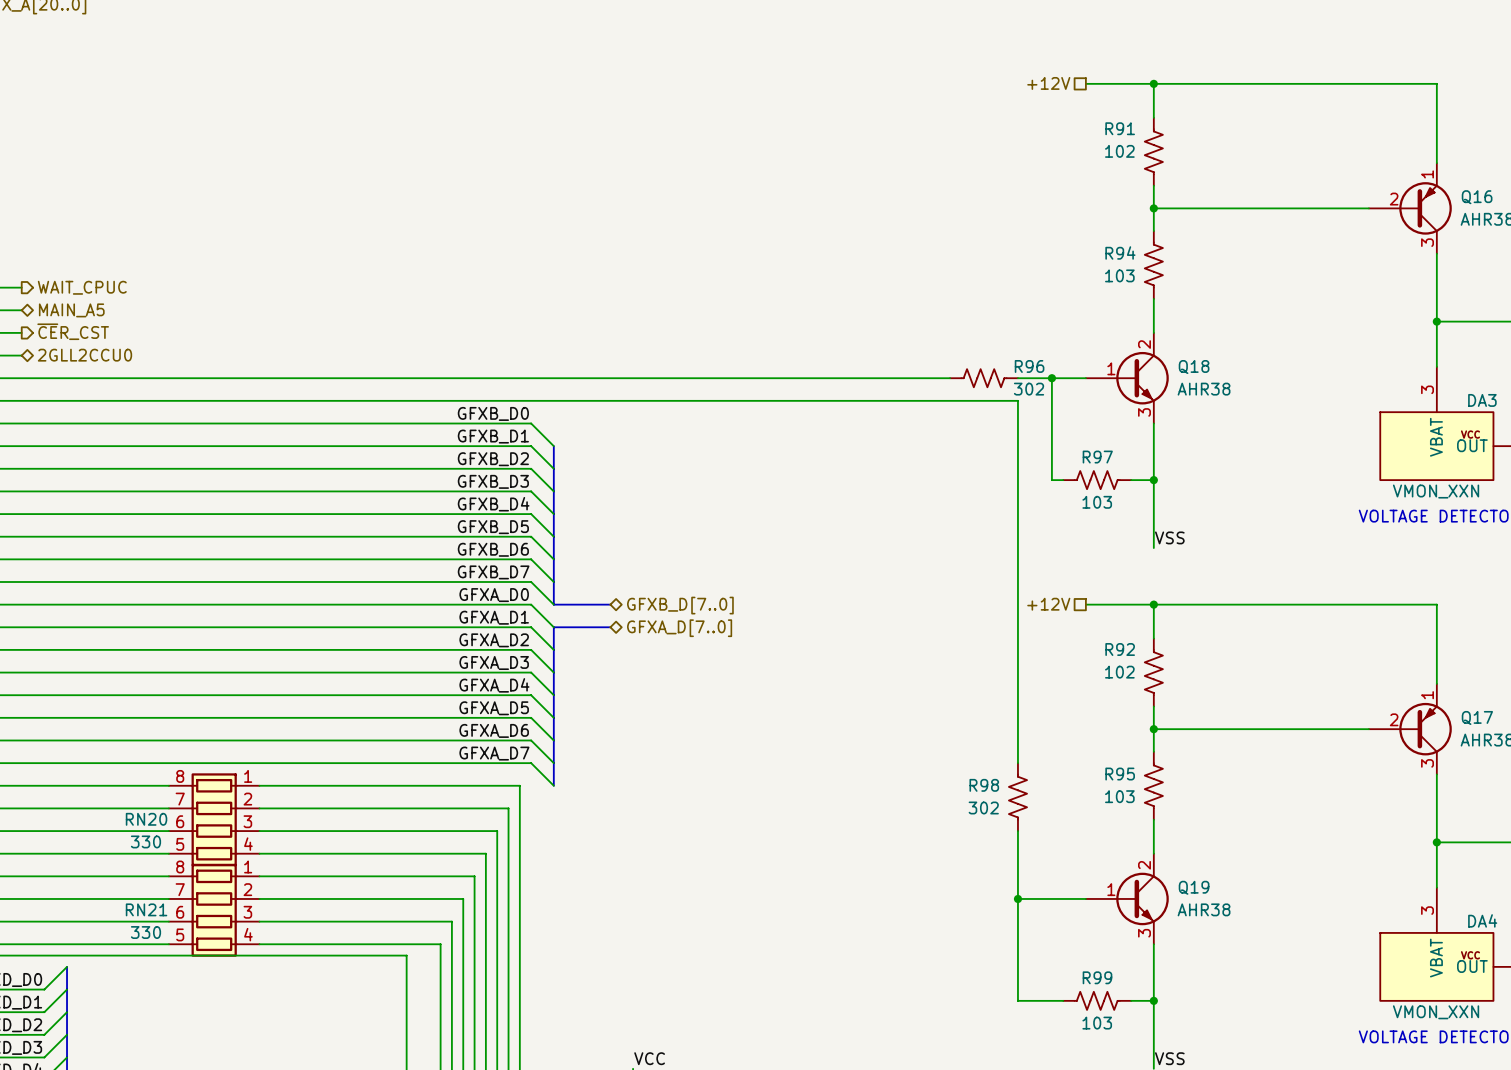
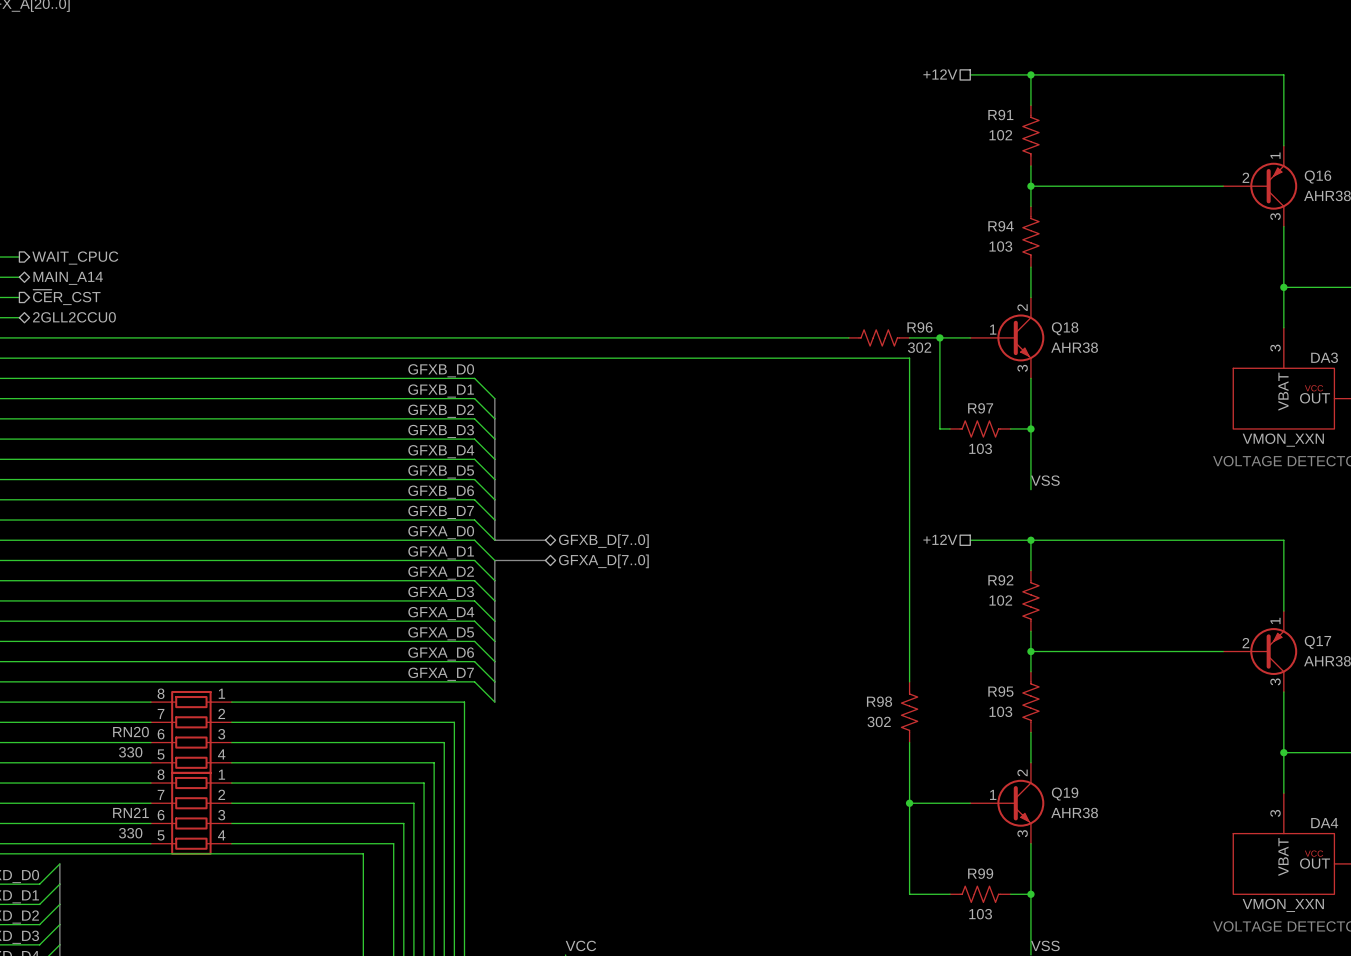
hierarchical label: MAIN_A5 (71, 310) -> MAIN_A14 (68, 278)

